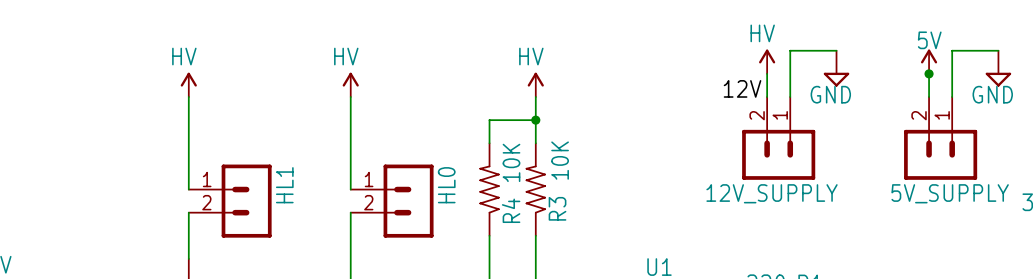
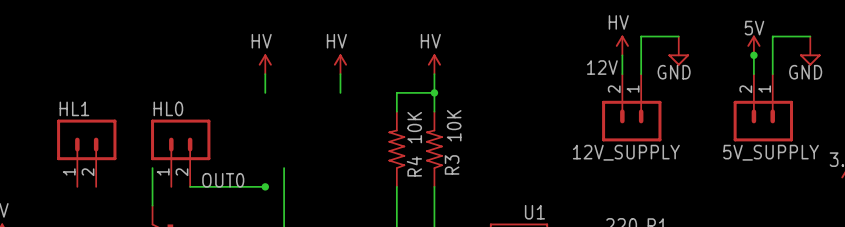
power symbol: HV (188, 84) -> none
power symbol position: HV (350, 84) -> HV (265, 64)
power symbol: none -> HV (340, 64)
wire: (188, 97) (188, 189) -> none
wire: none -> (265, 74) (265, 92)
wire: (350, 97) (350, 189) -> none
wire: none -> (340, 74) (340, 92)
HL1 position: (230, 201) -> (86, 153)
HL1 rotation: 0° (246, 201) -> 90° counterclockwise (86, 139)
HL0 position: (392, 201) -> (180, 153)
HL0 rotation: 0° (408, 201) -> 90° counterclockwise (180, 139)
label: none -> OUT0 (223, 180)
wire: none -> (190, 186) (265, 186)
junction: none -> (265, 186)

